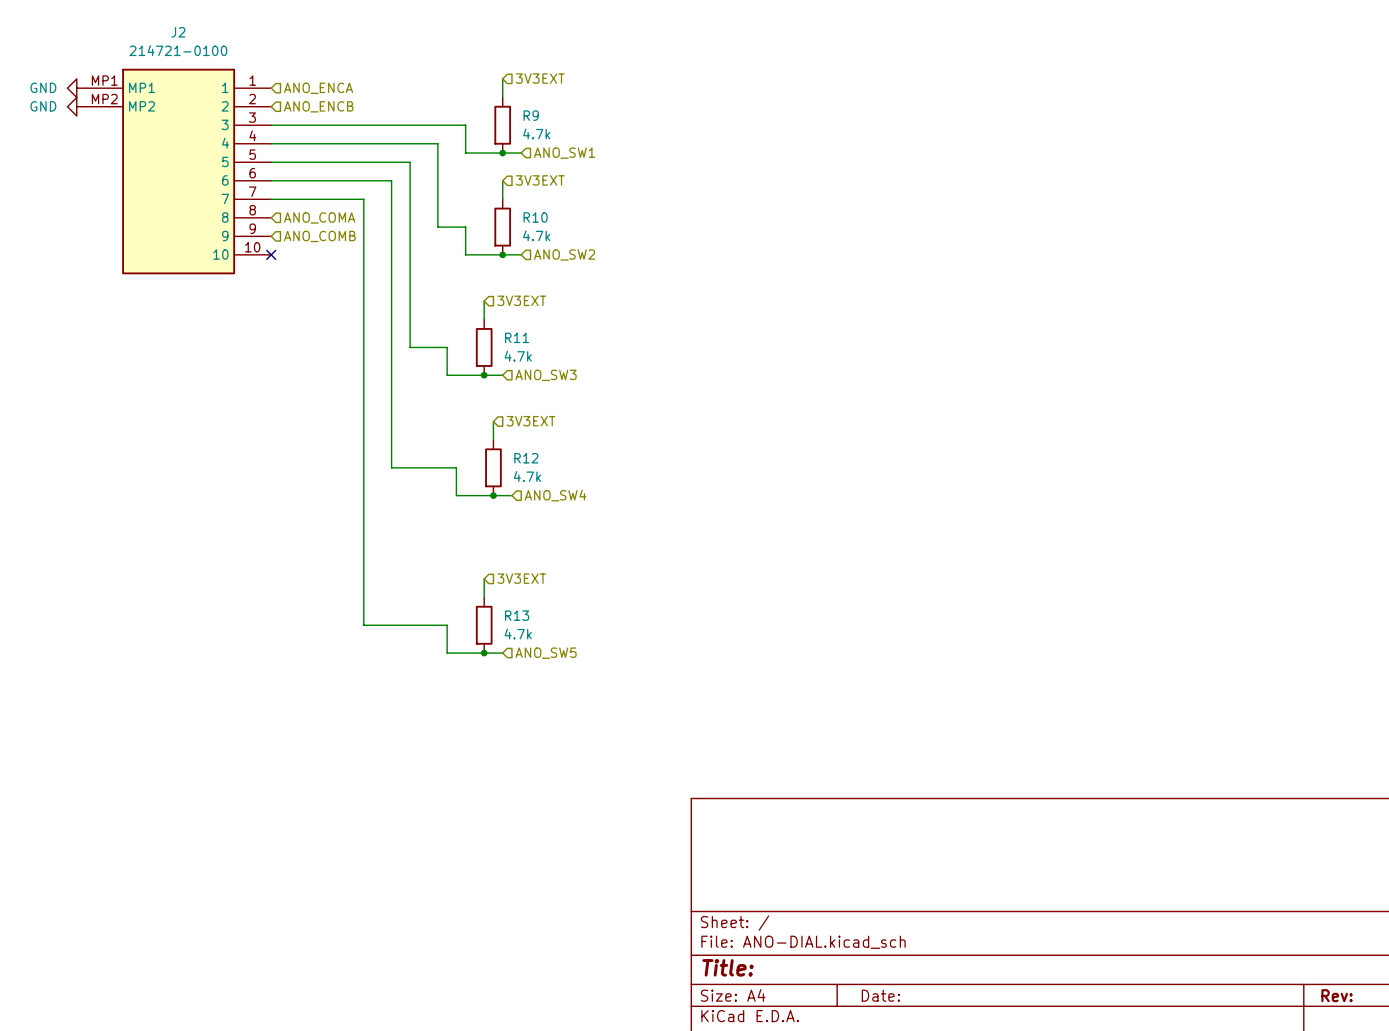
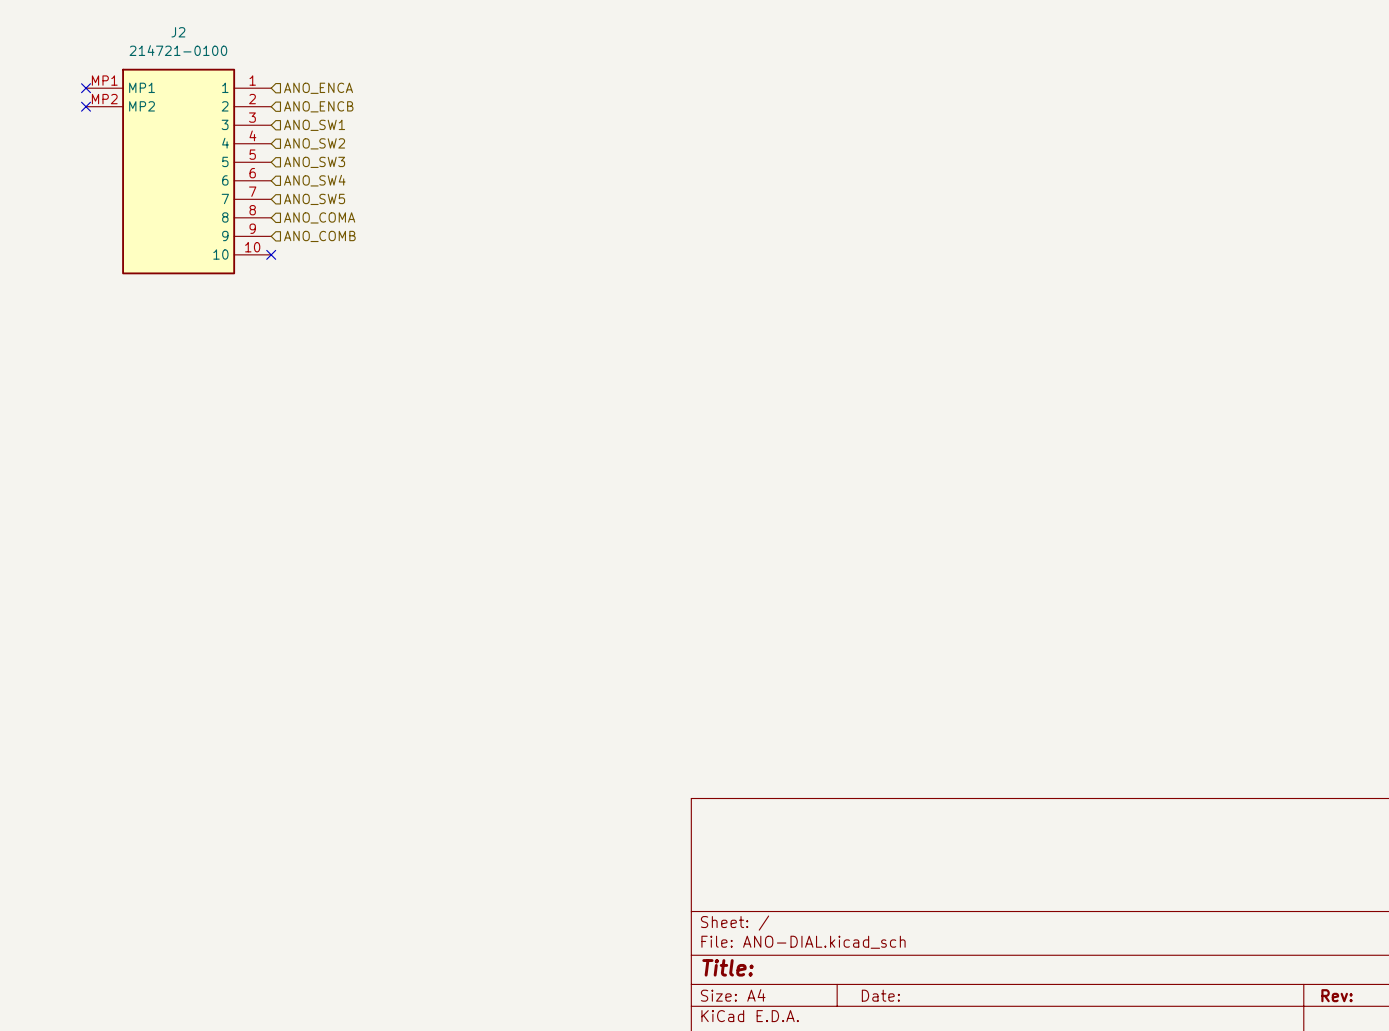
wire: (502, 78) (502, 97) -> none
hierarchical label: 3V3EXT (540, 78) -> none
power symbol: GND (76, 88) -> none
no-connect mark: none -> (86, 88)
power symbol: GND (76, 106) -> none
no-connect mark: none -> (86, 106)
wire: (271, 125) (465, 125) (465, 153) (521, 153) -> none
hierarchical label: none -> ANO_SW1 (314, 125)
R9: 4.7k (502, 125) -> none
wire: (271, 143) (437, 143) (437, 227) (465, 227) (465, 254) (521, 254) -> none
hierarchical label: none -> ANO_SW2 (314, 143)
junction: (502, 153) -> none
hierarchical label: ANO_SW1 (564, 153) -> none
wire: (271, 162) (410, 162) (410, 347) (447, 347) (447, 375) (502, 375) -> none
hierarchical label: none -> ANO_SW3 (314, 162)
wire: (271, 180) (391, 180) (391, 467) (456, 467) (456, 495) (511, 495) -> none
hierarchical label: none -> ANO_SW4 (314, 180)
wire: (502, 180) (502, 199) -> none
hierarchical label: 3V3EXT (540, 180) -> none
wire: (271, 199) (363, 199) (363, 625) (447, 625) (447, 653) (502, 653) -> none
hierarchical label: none -> ANO_SW5 (314, 199)
R10: 4.7k (502, 227) -> none
junction: (502, 254) -> none
hierarchical label: ANO_SW2 (564, 254) -> none
hierarchical label: 3V3EXT (521, 300) -> none
wire: (484, 301) (484, 319) -> none
R11: 4.7k (484, 347) -> none
junction: (484, 375) -> none
hierarchical label: ANO_SW3 (546, 375) -> none
wire: (493, 421) (493, 440) -> none
hierarchical label: 3V3EXT (531, 421) -> none
R12: 4.7k (493, 467) -> none
junction: (493, 495) -> none
hierarchical label: ANO_SW4 (555, 495) -> none
wire: (484, 578) (484, 597) -> none
hierarchical label: 3V3EXT (521, 578) -> none
R13: 4.7k (484, 625) -> none
junction: (484, 653) -> none
hierarchical label: ANO_SW5 (546, 653) -> none

